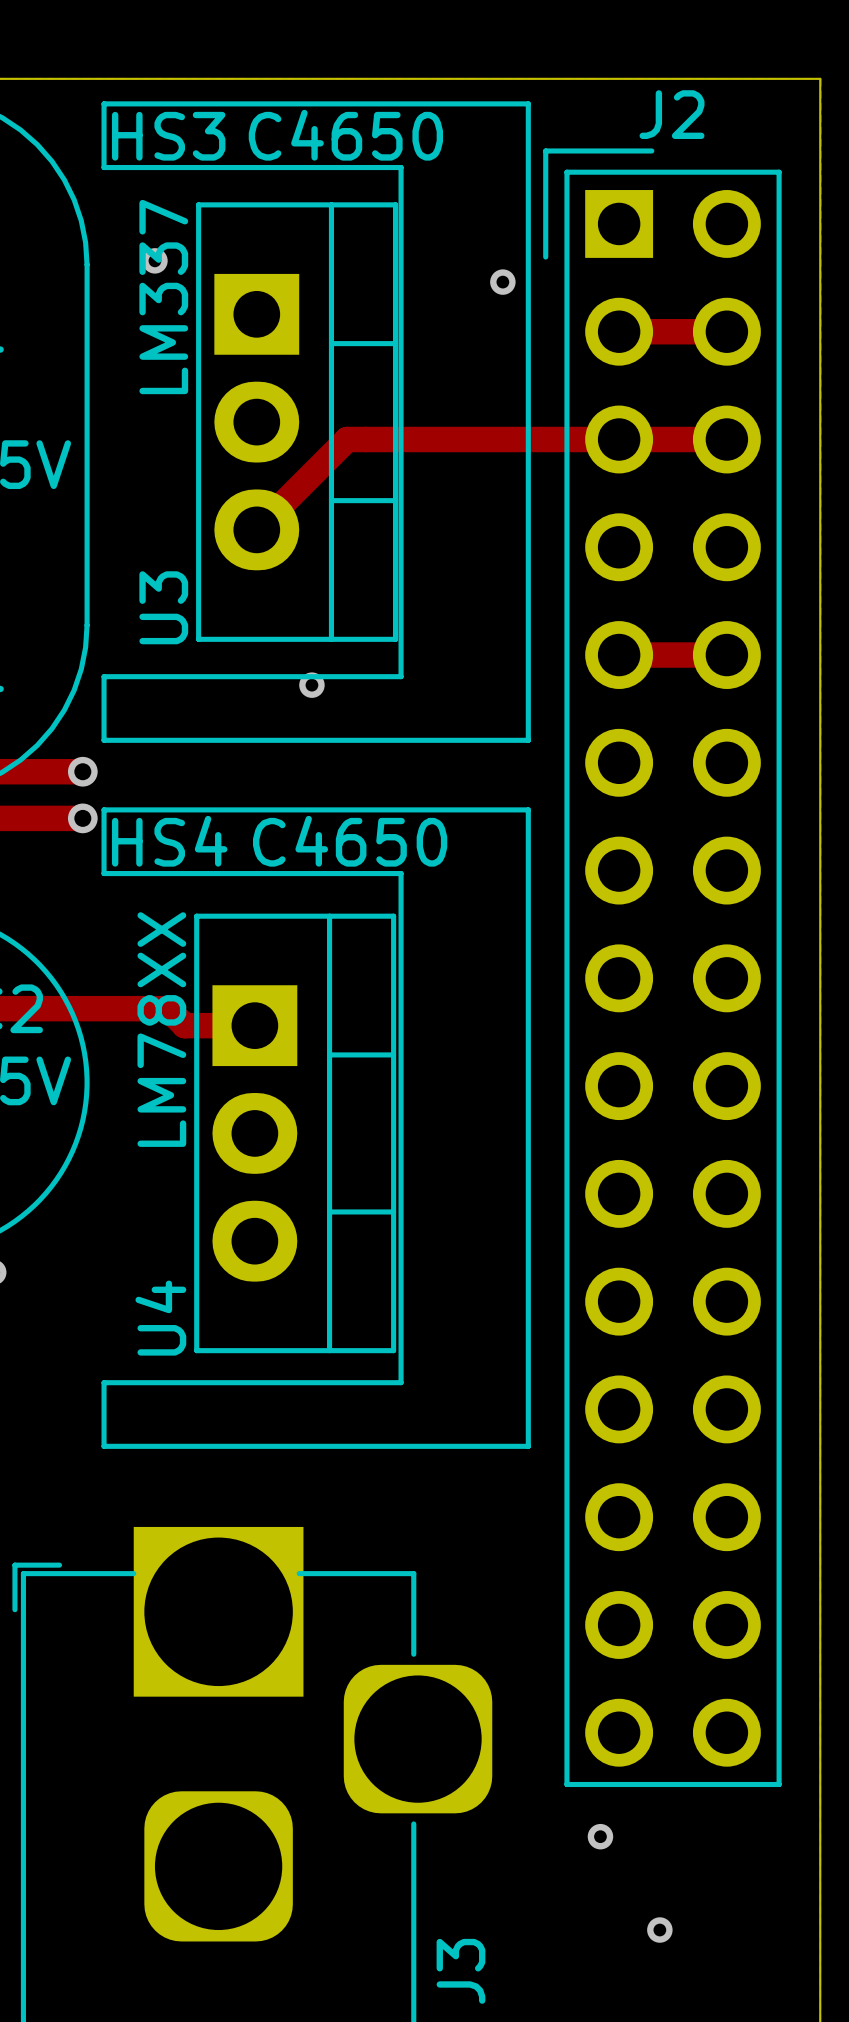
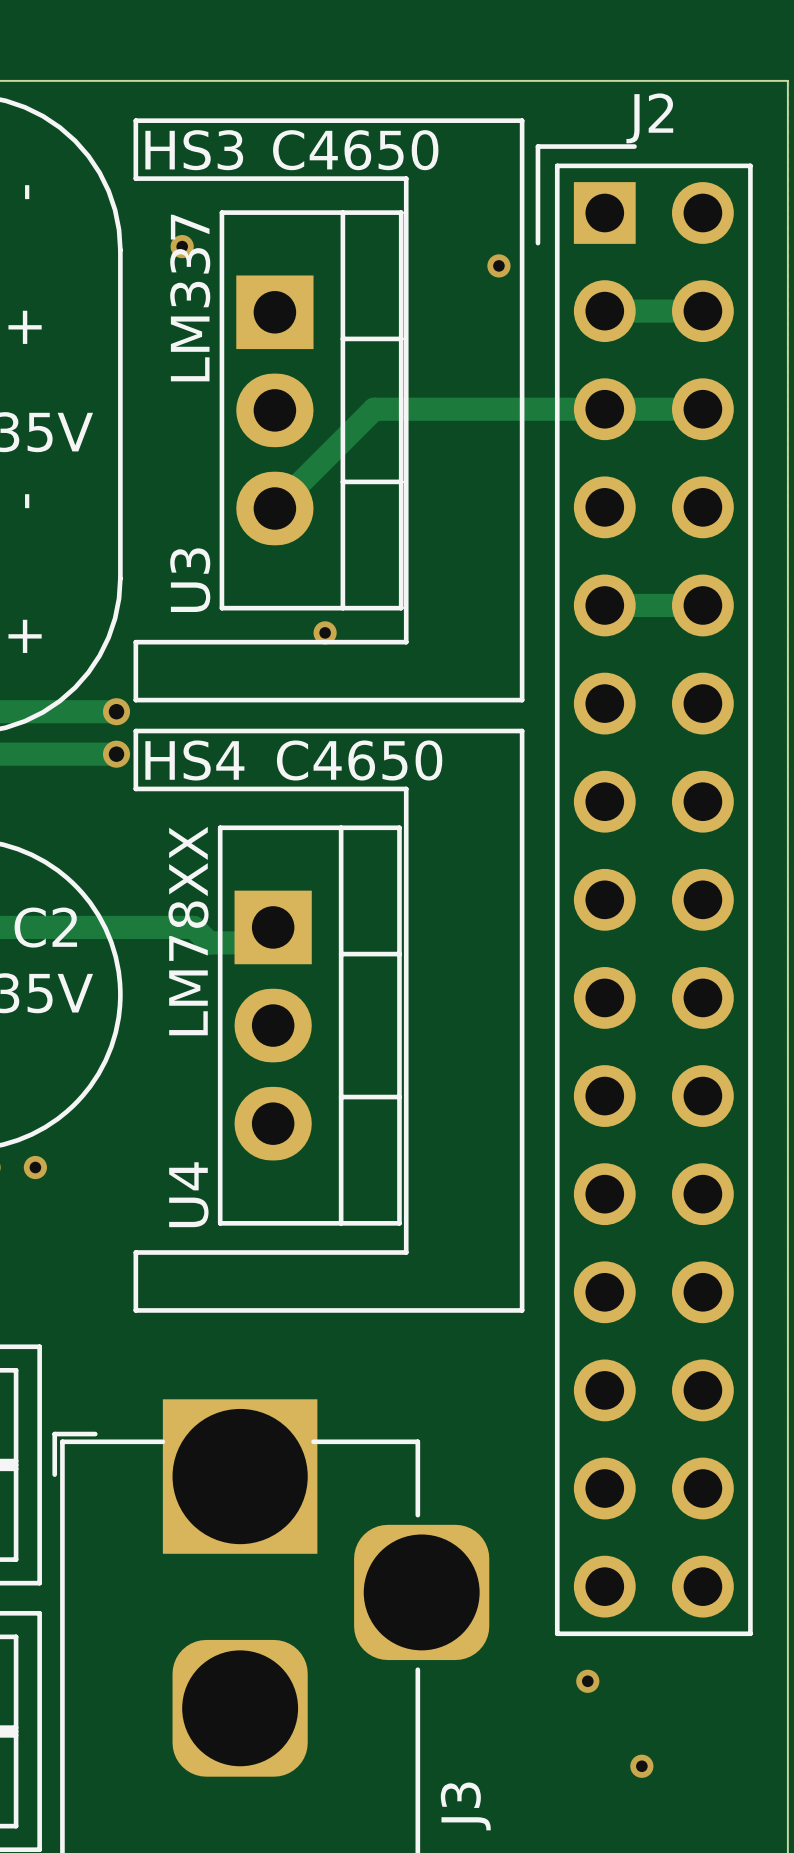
U3 position: (297, 422) -> (311, 410)
HS3 position: (316, 422) -> (328, 410)
track: (365, 439) (347, 439) (256, 529) -> (374, 409) (274, 508)
HS4 position: (316, 1128) -> (328, 1020)
U4 position: (295, 1133) -> (309, 1025)

